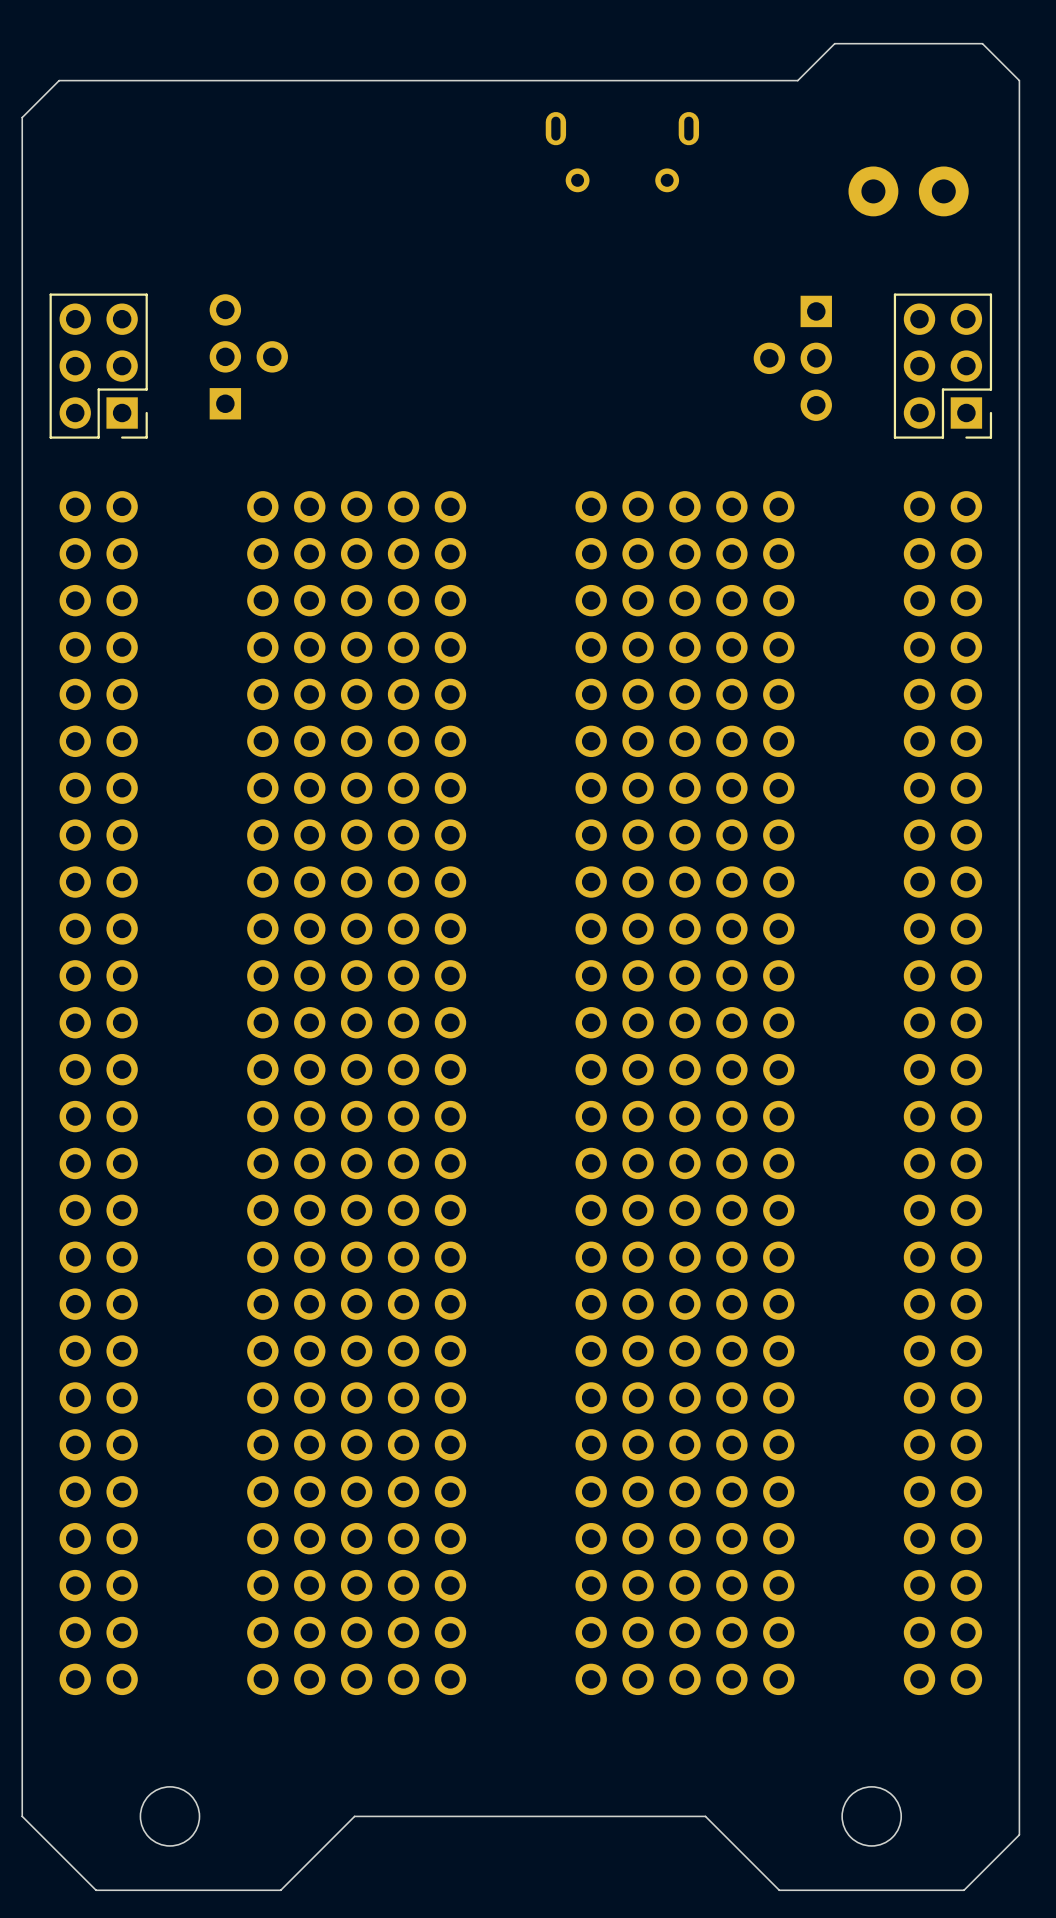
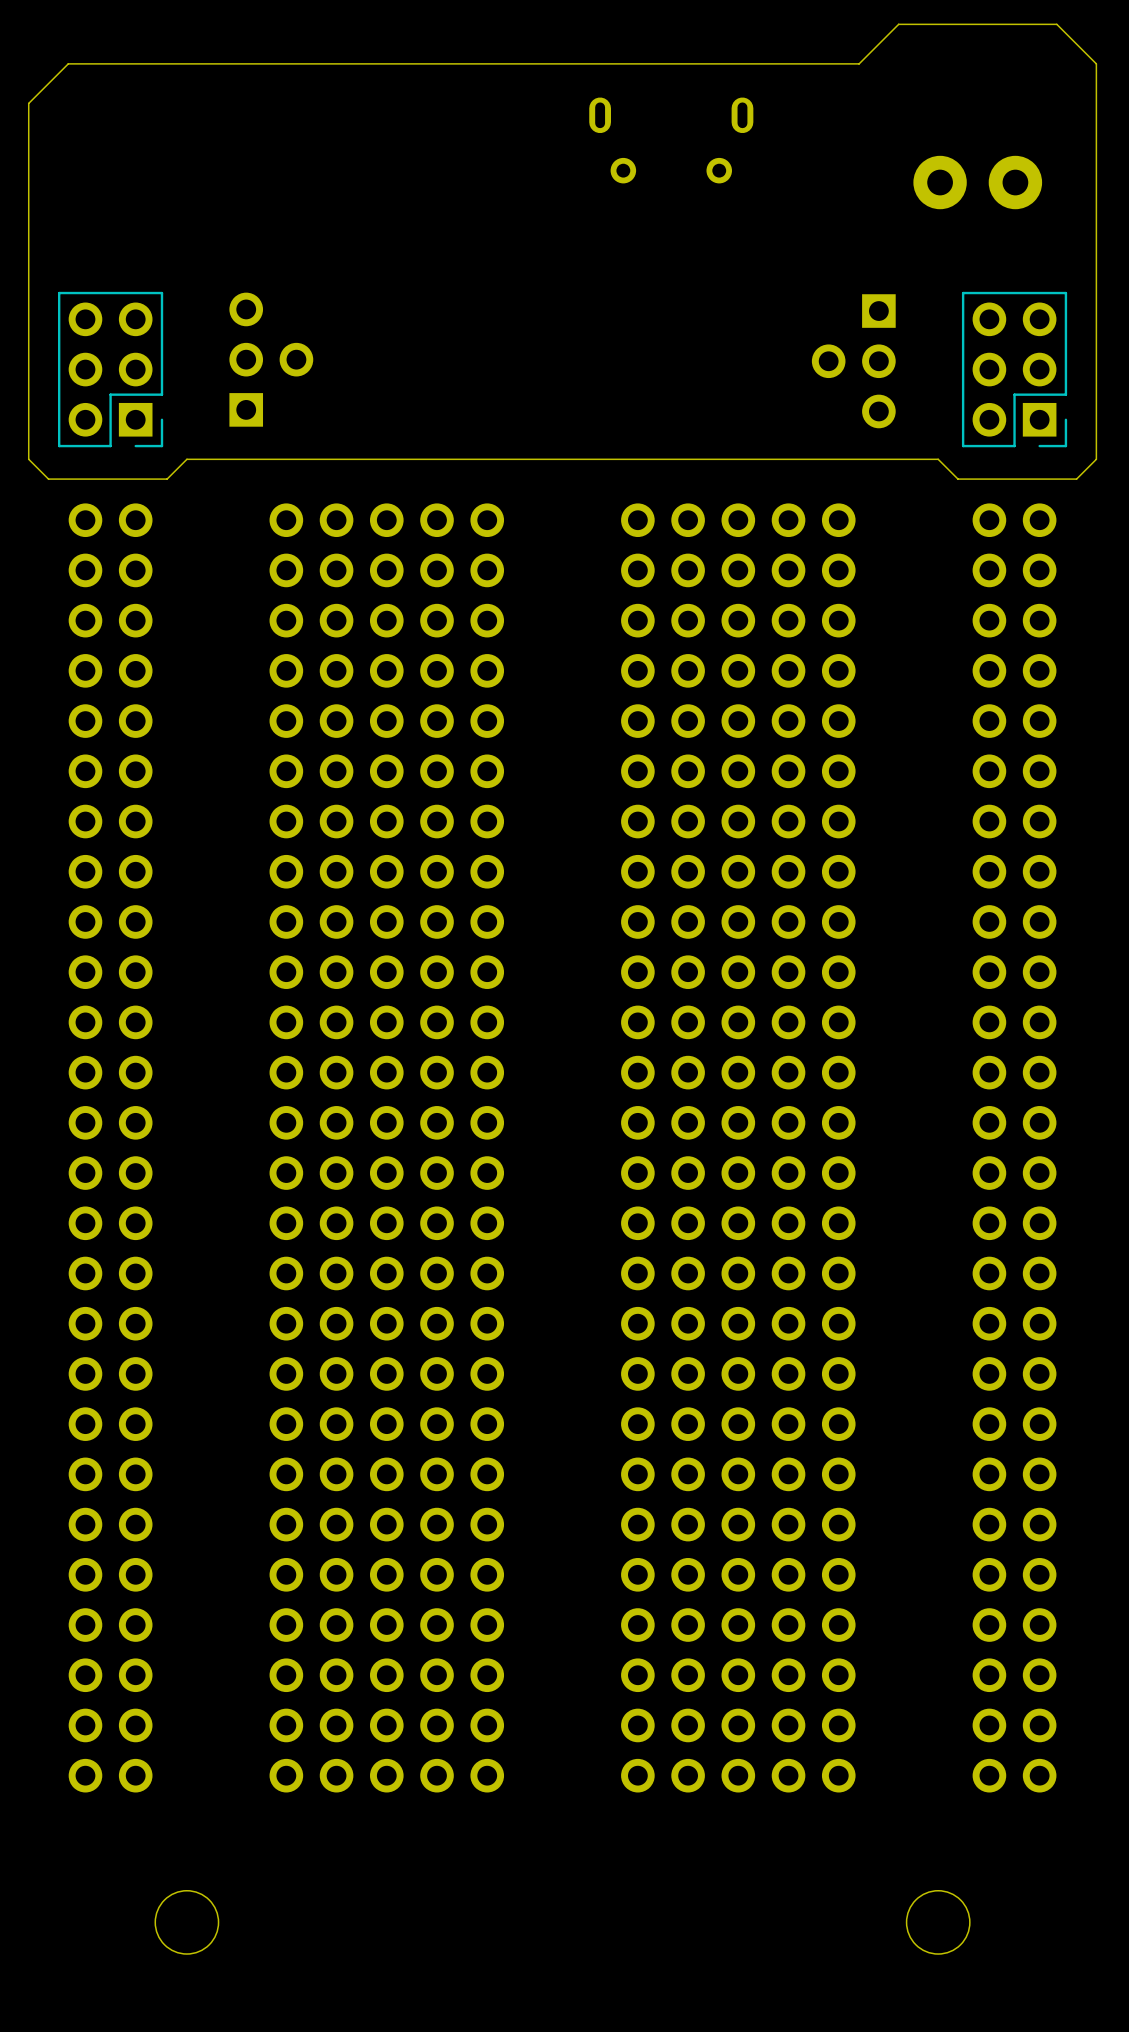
board edge: (1019, 449) (1019, 1834) (964, 1890) (779, 1890) (705, 1816) (354, 1816) (280, 1890) (96, 1890) (22, 1816) (22, 449) -> (1096, 459) (1076, 479) (957, 479) (938, 459) (186, 459) (167, 479) (48, 479) (28, 459)

